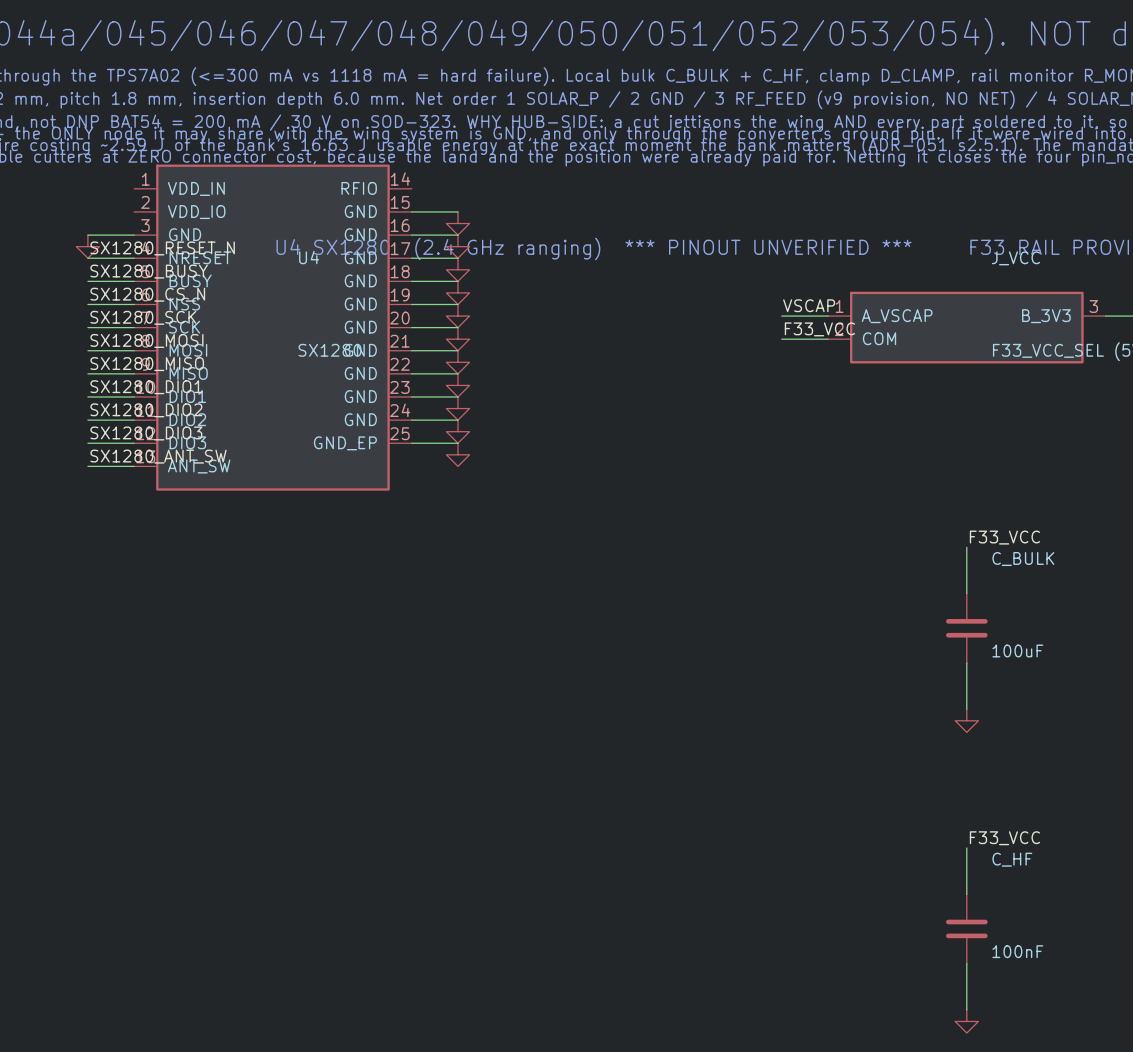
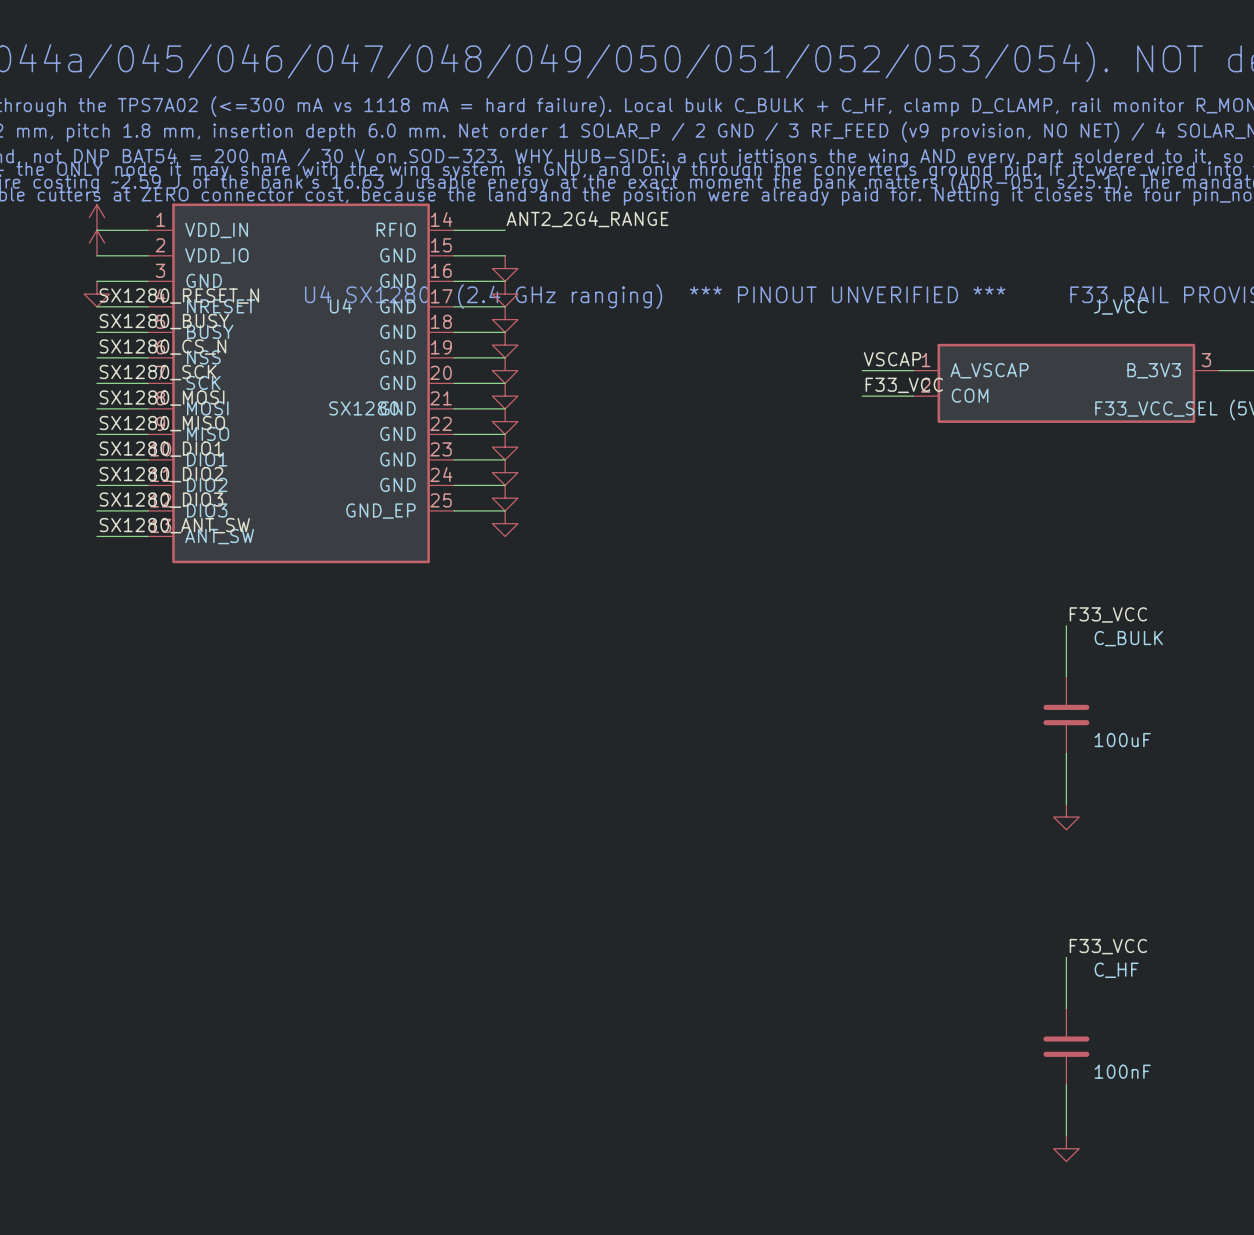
power symbol: none -> (96, 217)
label: none -> ANT2_2G4_RANGE (587, 219)
wire: none -> (96, 230) (147, 230)
wire: none -> (454, 230) (505, 230)
power symbol: none -> (96, 243)
wire: none -> (96, 255) (147, 255)

